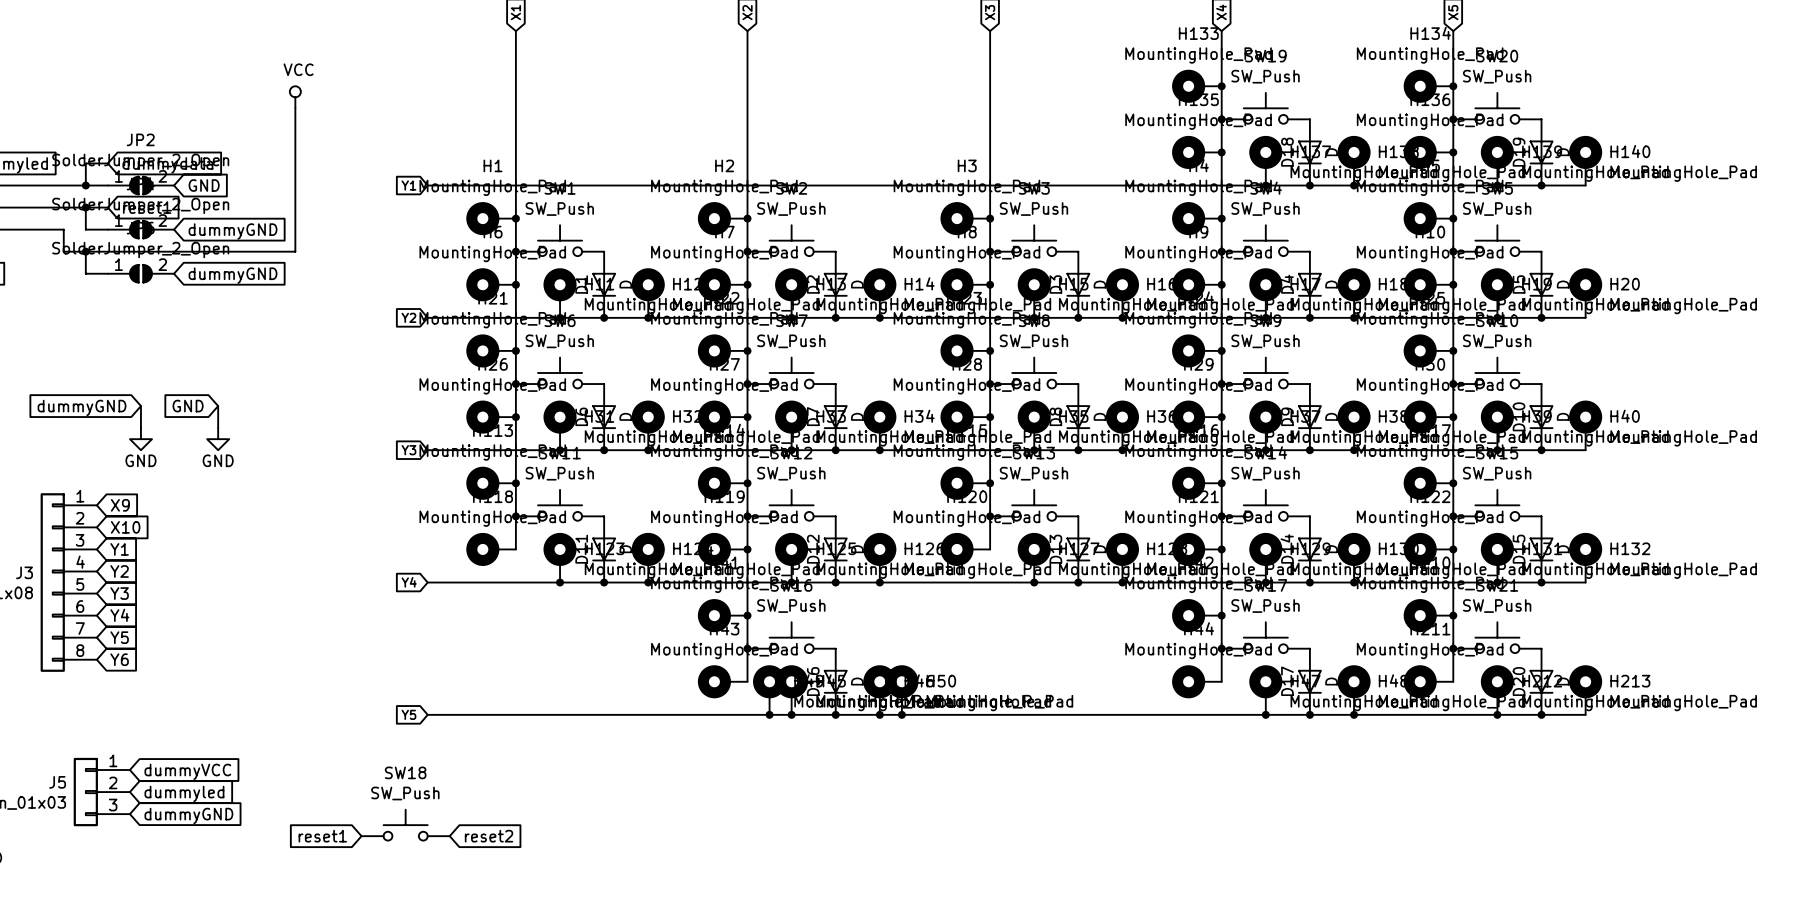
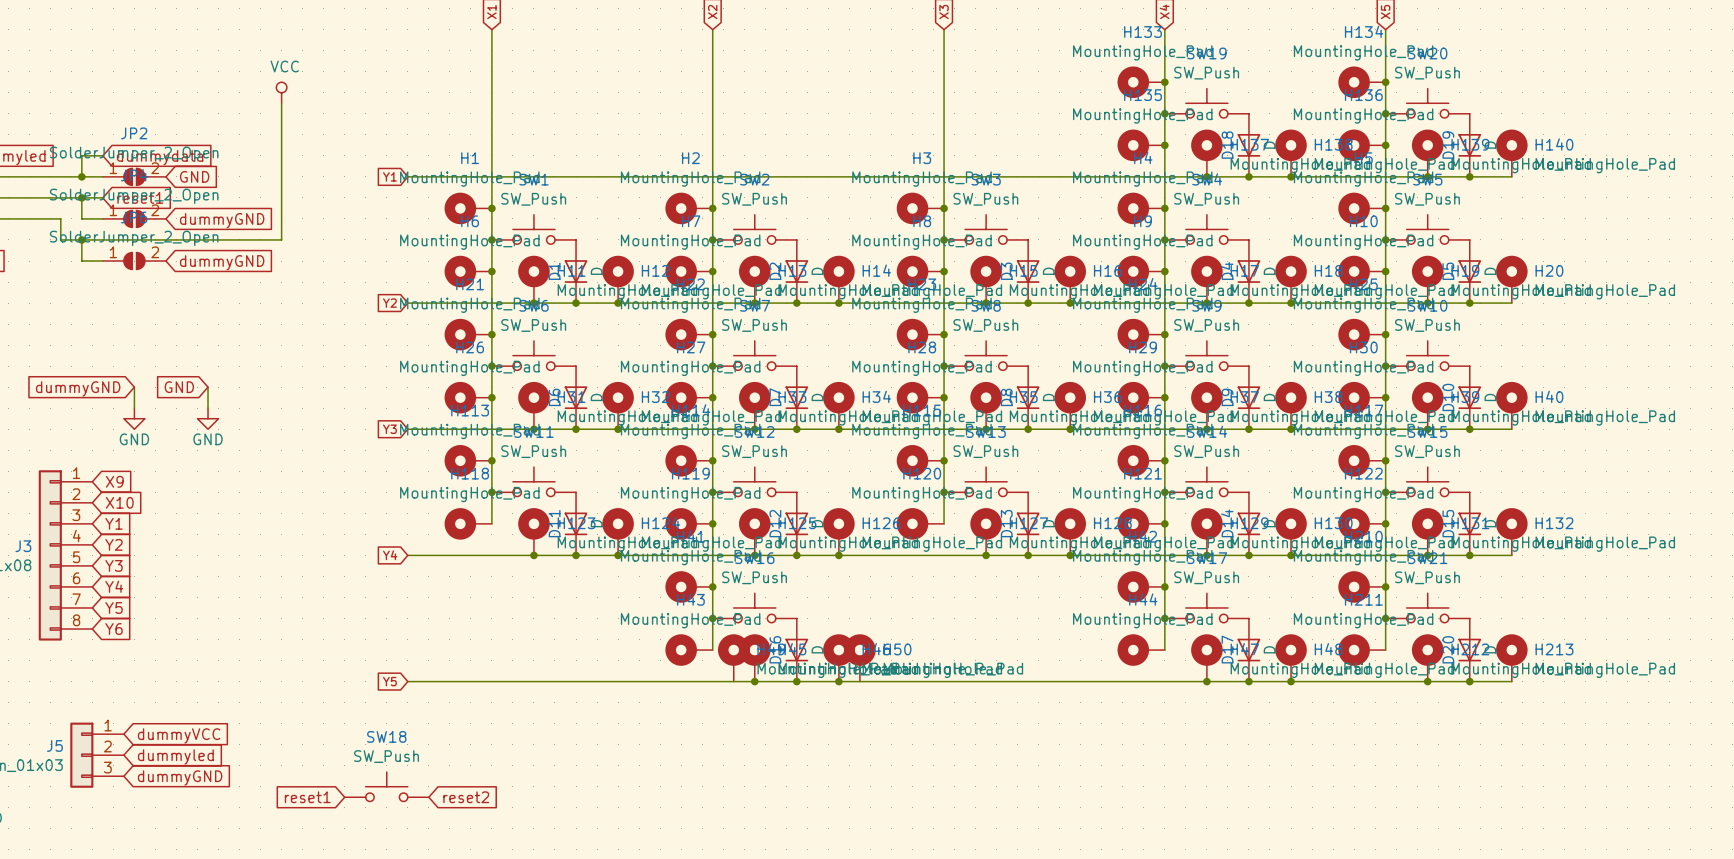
junction: (769, 714) -> none
junction: (901, 714) -> none

